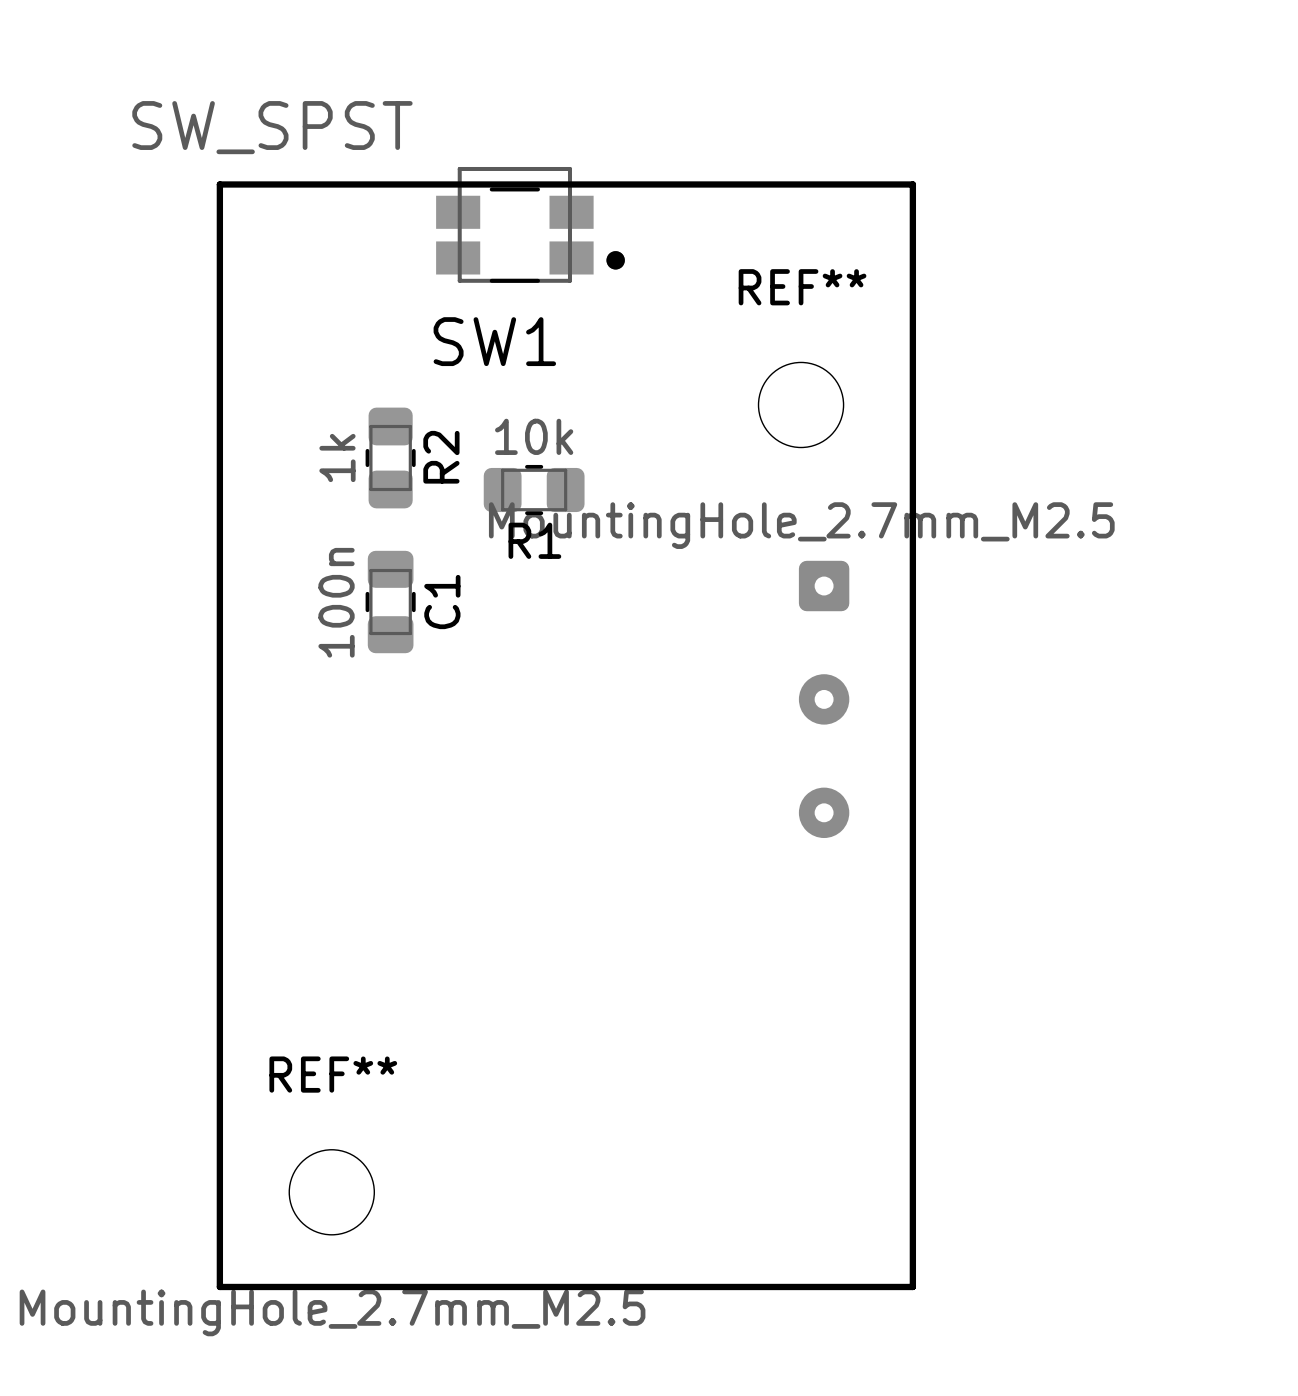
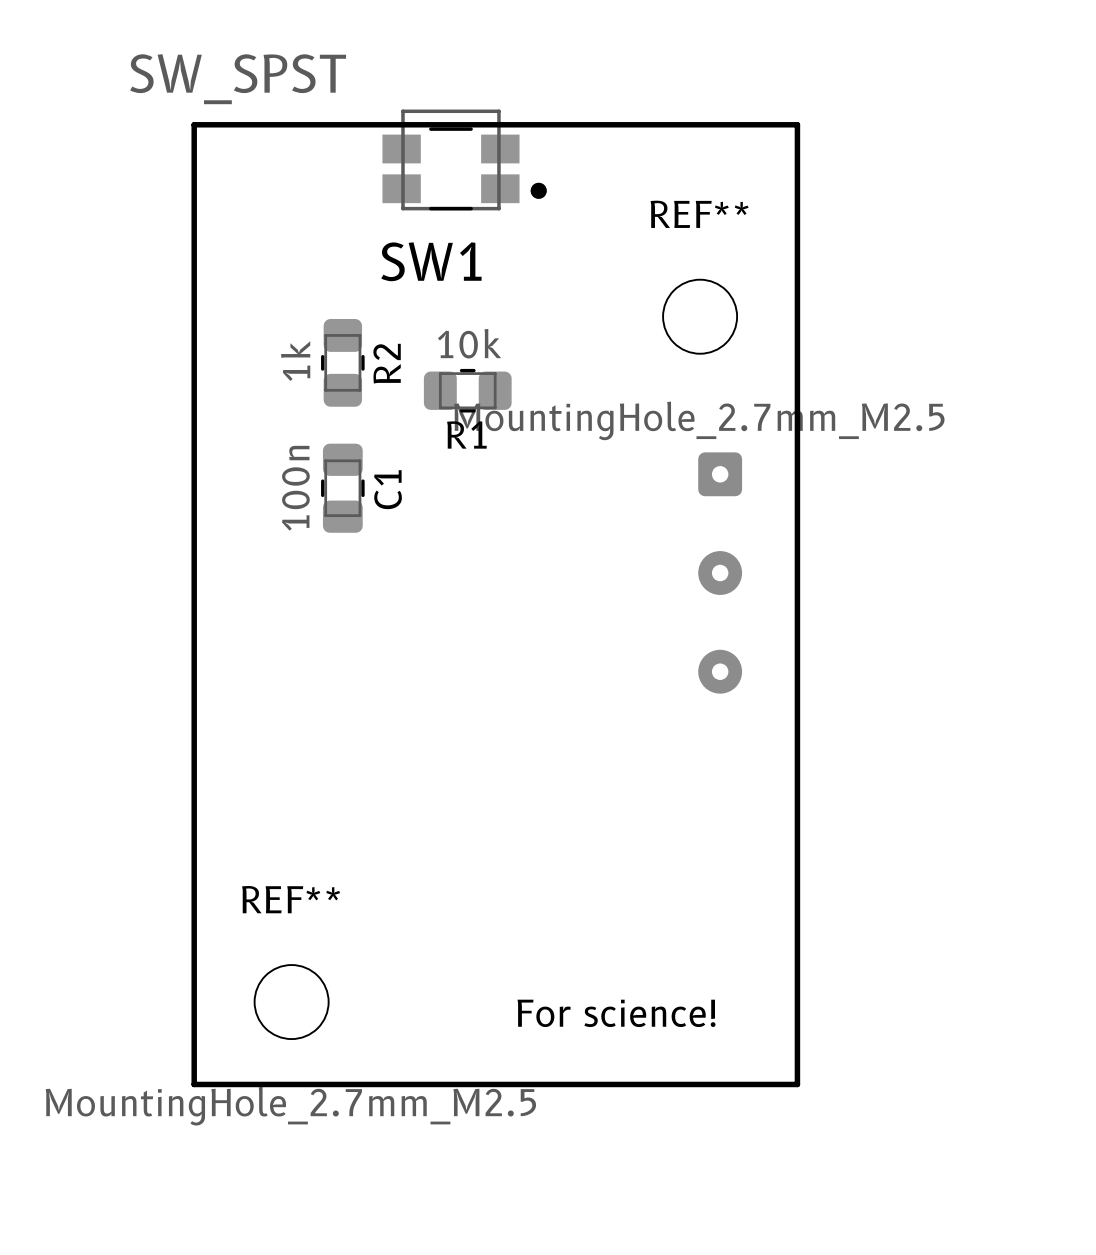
text: none -> For science! (616, 1013)

